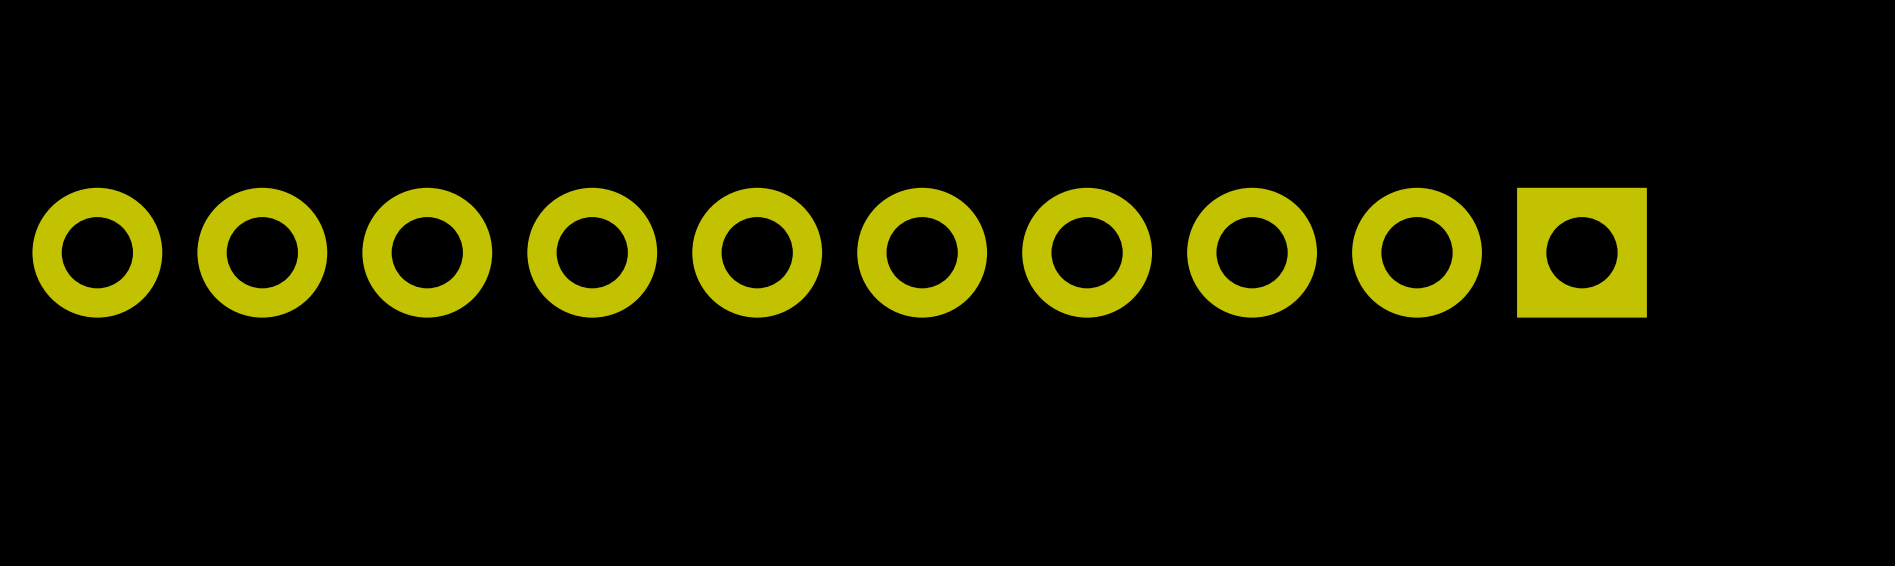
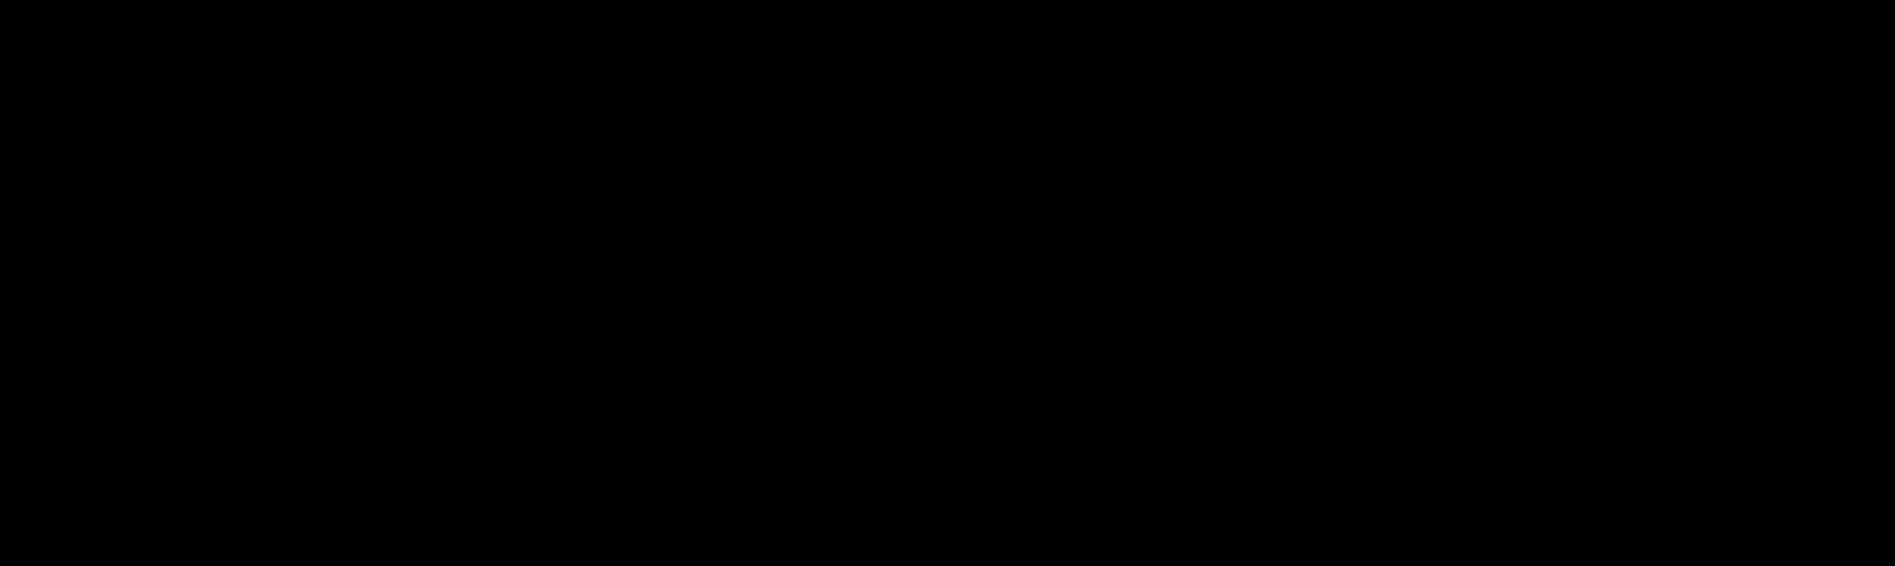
part: (839, 252) -> none

